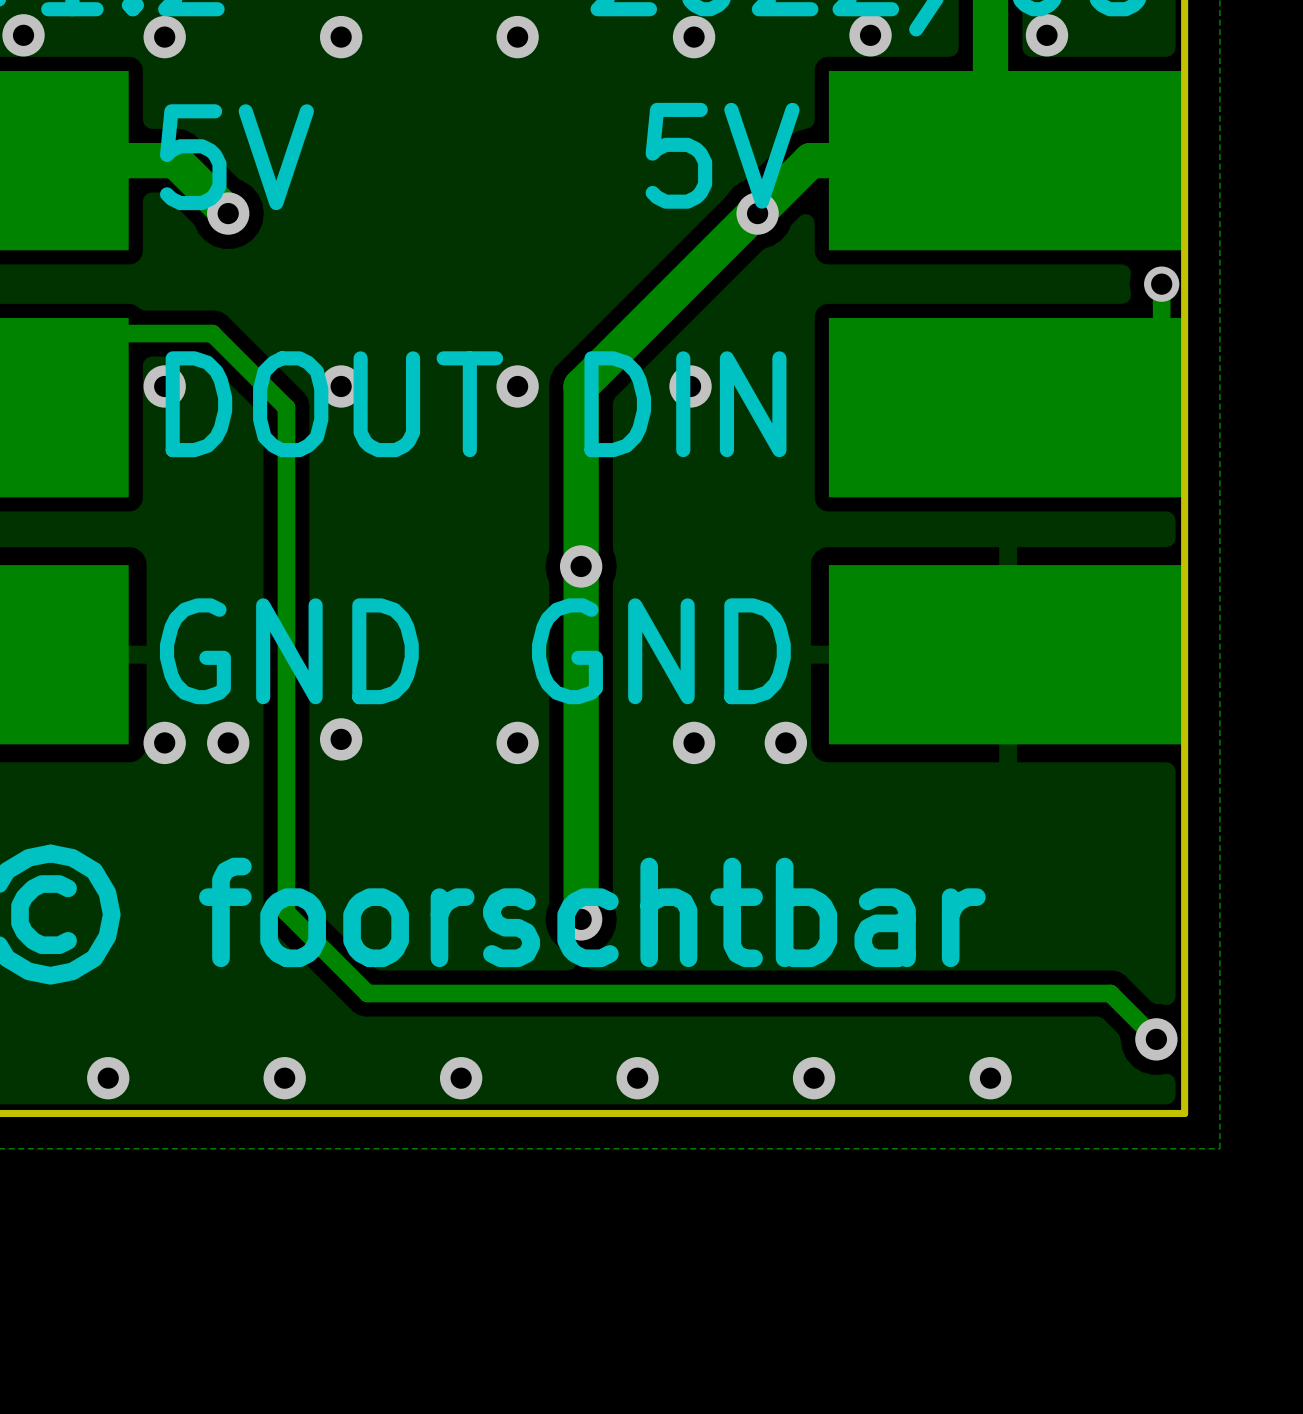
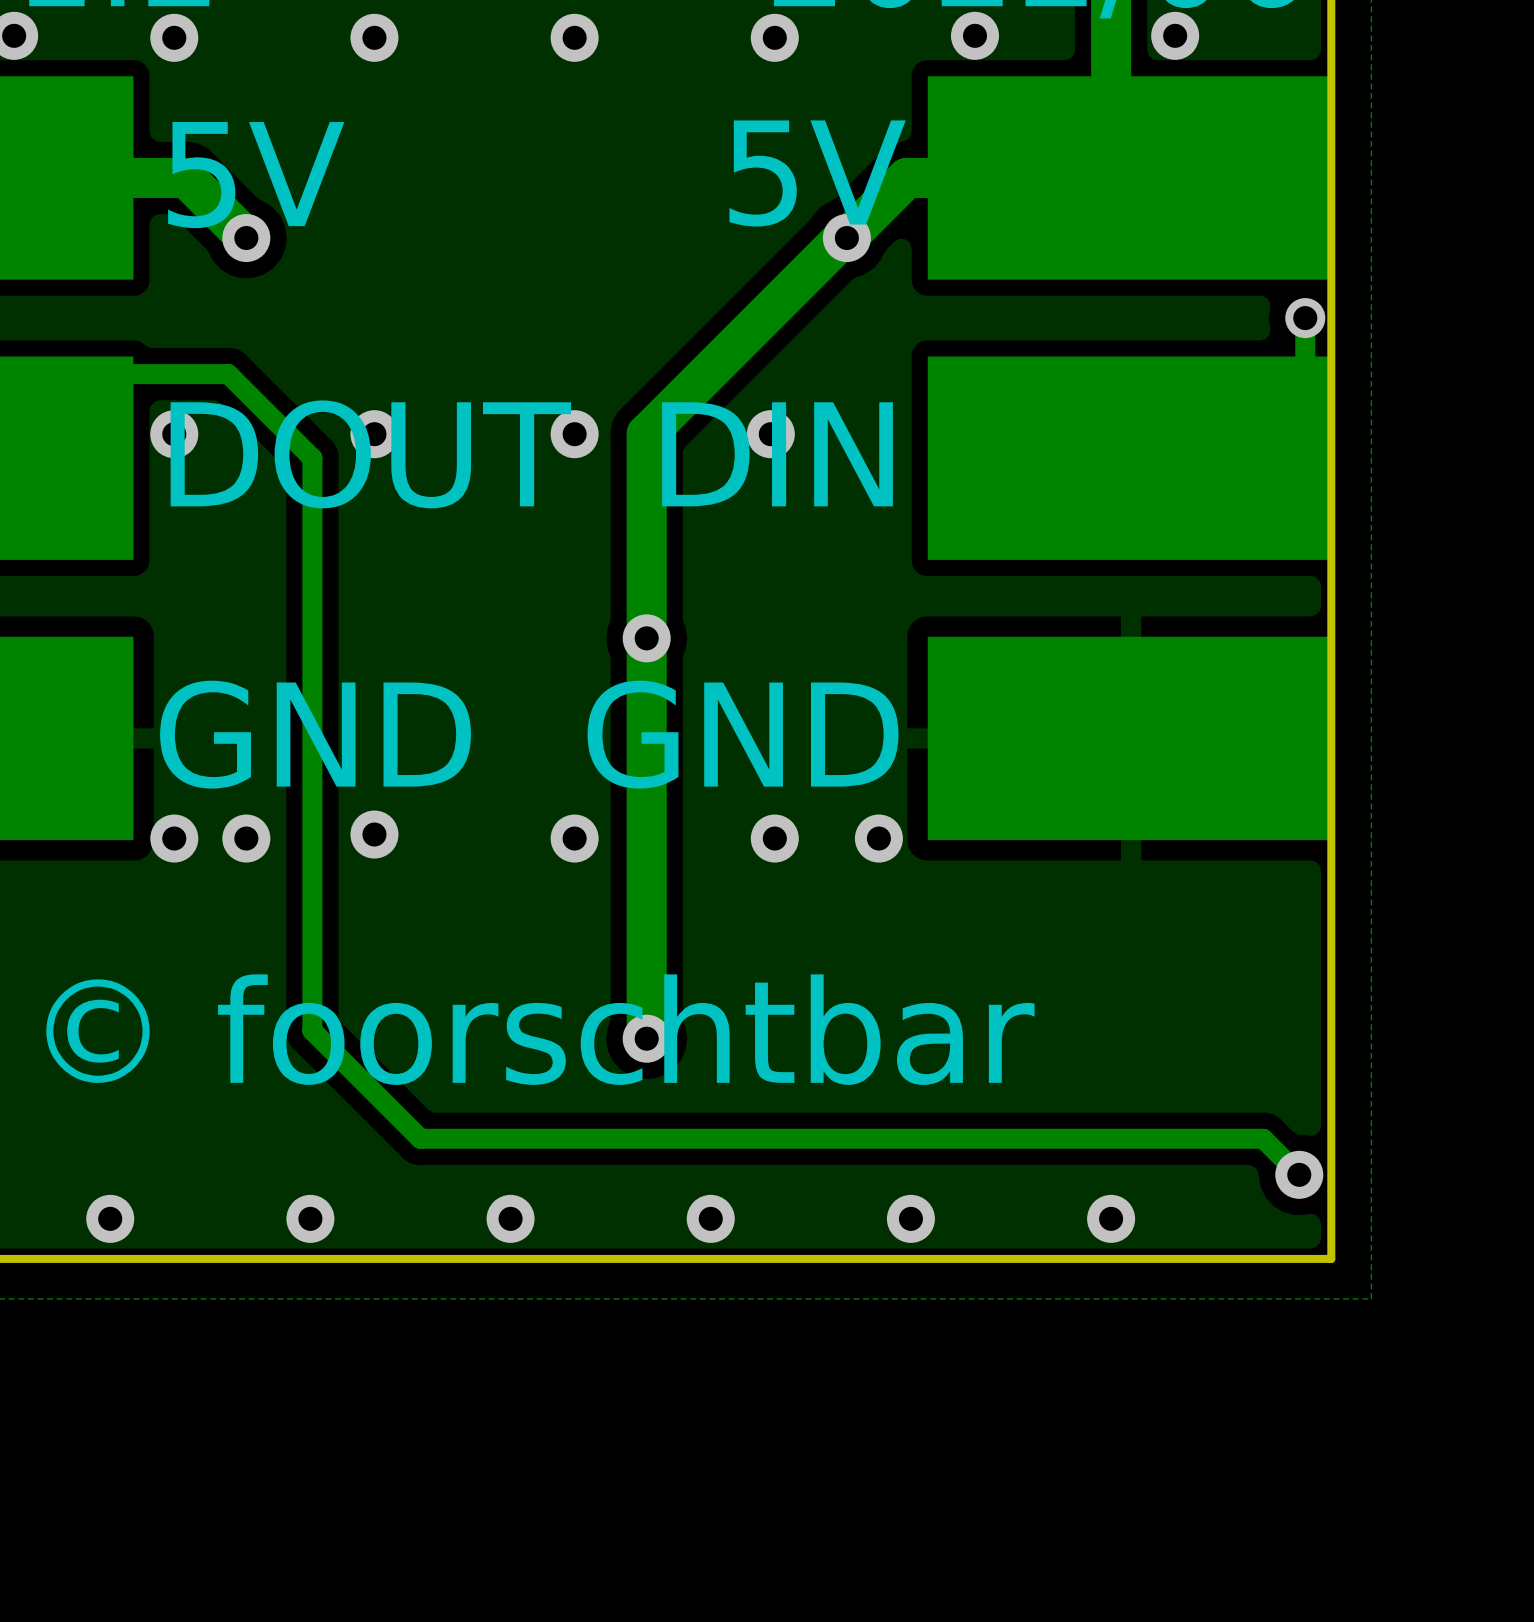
track: (367, 993) (1110, 993) (1124, 1007) -> (404, 1122) (420, 1138) (1263, 1138)

